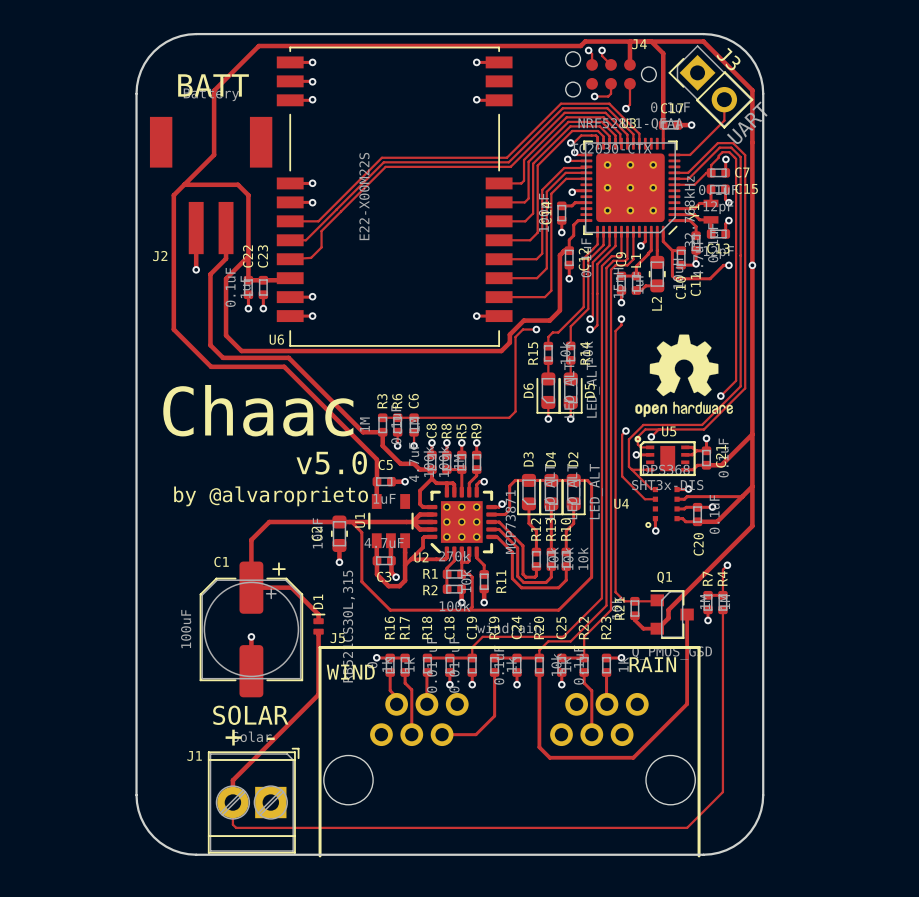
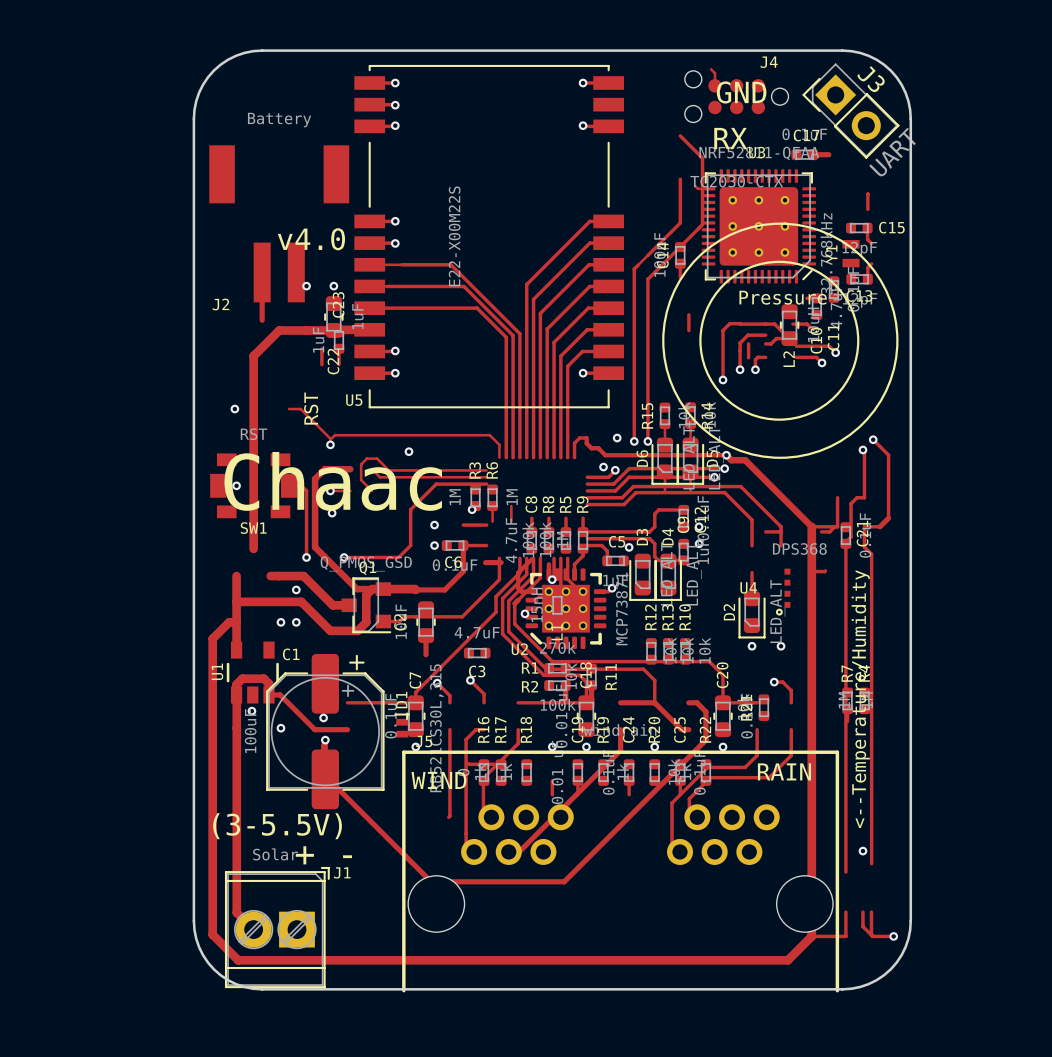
track: (630, 41) (629, 64) -> none
track: (651, 41) (663, 53) (663, 143) -> none
via: (588, 50) -> none
track: (602, 50) (602, 55) (611, 64) -> none
via: (602, 50) -> none
text: none -> GND (741, 92)
track: (611, 83) (611, 93) (608, 96) (594, 96) -> none
track: (629, 83) (629, 104) (625, 108) -> none
text: BATT (213, 85) -> none
via: (594, 96) -> none
track: (724, 99) (724, 120) (690, 154) (674, 154) -> none
track: none -> (680, 135) (702, 158) (702, 224) (647, 279) (647, 441)
via: (625, 108) -> none
text: none -> RX (730, 138)
via: (691, 125) -> none
track: (570, 142) (573, 142) (581, 135) (596, 135) (597, 143) -> none
via: (570, 142) -> none
track: (603, 143) (603, 136) (597, 130) (572, 130) (537, 165) (537, 232) (530, 240) (499, 240) -> (547, 457) (547, 329) (589, 286) (608, 286)
track: (609, 143) (609, 136) (599, 126) (570, 126) (533, 163) (533, 213) -> (680, 179) (680, 222) (647, 255)
track: (615, 143) (615, 135) (601, 121) (568, 121) (528, 161) (528, 198) (524, 202) (499, 202) -> (533, 457) (533, 299) (589, 243) (608, 243)
track: (621, 143) (620, 134) (603, 117) (566, 117) (524, 159) (524, 180) (521, 183) (499, 183) -> (526, 457) (526, 284) (589, 221) (608, 221)
track: (627, 143) (627, 134) (605, 112) (564, 112) (510, 166) (385, 166) (321, 231) (321, 247) (311, 257) (290, 259) -> (506, 457) (506, 337) (477, 308) (369, 308)
track: (633, 143) (633, 134) (607, 108) (562, 108) (508, 162) (383, 162) (305, 240) -> (513, 457) (513, 335) (463, 286) (387, 286)
track: (639, 143) (639, 133) (609, 103) (560, 103) (506, 157) (381, 157) (318, 221) -> (519, 457) (519, 333) (450, 264) (401, 264)
via: (574, 152) -> none
track: (567, 159) (586, 160) -> none
via: (567, 159) -> none
via: (725, 159) -> none
track: (586, 166) (564, 168) (542, 189) (542, 253) (536, 259) (499, 259) -> (554, 457) (554, 342) (588, 308) (608, 308)
C7 footprint: [706, 168, 731, 178] -> [406, 695, 426, 738]
track: (586, 172) (565, 172) (546, 191) (546, 268) (537, 278) (499, 278) -> (560, 457) (560, 356) (587, 329) (608, 329)
track: (674, 172) (688, 172) (717, 143) (733, 143) (745, 155) (745, 388) (704, 429) (645, 429) (637, 436) (637, 444) (640, 447) (650, 447) -> none
C7 name position: C7 (742, 172) -> C7 (415, 680)
track: (586, 178) (566, 178) (551, 193) (551, 290) (544, 297) (499, 297) -> (567, 457) (567, 366) (582, 351) (608, 351)
track: (674, 178) (688, 178) (719, 147) (731, 147) (740, 157) (740, 386) (702, 424) (643, 424) (628, 439) (628, 466) (651, 489) (655, 489) -> none
track: (184, 184) (237, 184) (248, 195) (248, 280) (288, 280) (290, 278) -> (253, 548) (253, 356) (279, 330) (369, 329)
drawing: none -> [662, 222, 899, 459]
track: (674, 184) (694, 184) (706, 172) (711, 172) (711, 165) (722, 152) (729, 152) (736, 158) (736, 380) (720, 396) -> none
track: (711, 189) (711, 203) (699, 203) (694, 208) (674, 208) -> none
track: (586, 190) (572, 192) -> none
via: (572, 192) -> none
text: none -> v4.0 (311, 239)
track: (586, 202) (561, 205) -> none
via: (728, 202) -> none
track: (674, 214) (694, 214) (699, 219) (711, 219) (711, 234) -> none
track: (586, 220) (578, 220) (573, 225) (573, 235) (569, 239) (569, 250) (563, 251) -> none
track: (674, 220) (690, 220) (696, 226) (696, 235) -> none
via: (728, 220) -> none
track: (499, 221) (525, 221) -> (634, 441) (634, 269) (638, 264)
track: none -> (608, 264) (589, 264) (540, 313) (540, 457)
track: (226, 228) (226, 258) (210, 274) (210, 345) (223, 357) (288, 357) (363, 432) (382, 432) (382, 445) (400, 463) (414, 463) (419, 469) (431, 469) (431, 478) (436, 483) (452, 483) (454, 492) -> none
track: (597, 231) (597, 244) (593, 248) -> none
track: (603, 231) (603, 245) (588, 260) (588, 308) (570, 326) (570, 345) -> none
track: (609, 231) (609, 245) (592, 262) (592, 316) (590, 319) -> none
track: (615, 231) (615, 246) (597, 264) (597, 325) (593, 329) (590, 329) -> none
track: (621, 231) (621, 254) (611, 256) (601, 266) (601, 598) (563, 636) (482, 636) (472, 647) (472, 658) (427, 658) -> none
track: (627, 231) (627, 258) (625, 260) (613, 260) (606, 267) (606, 605) (570, 641) (548, 641) (539, 650) (539, 658) (494, 658) -> none
track: (633, 231) (633, 259) (627, 265) (615, 265) (611, 269) (611, 610) (584, 636) (584, 658) (561, 658) -> none
track: (645, 231) (645, 241) (640, 245) -> none
track: (651, 231) (651, 250) (636, 266) (636, 276) (621, 276) -> none
track: (657, 231) (657, 262) -> none
track: (663, 231) (663, 241) (672, 250) (672, 276) (675, 278) (710, 278) (723, 265) (728, 265) -> none
via: (561, 232) -> none
via: none -> (306, 286)
via: none -> (333, 286)
via: (640, 245) -> none
track: (593, 249) (583, 258) (583, 307) (558, 332) (552, 332) (548, 336) (548, 346) -> none
text: none -> Pressure (783, 297)
track: (696, 250) (696, 263) (681, 265) -> none
track: (563, 251) (559, 255) (559, 310) (549, 320) (523, 320) (509, 334) (509, 342) (501, 351) (241, 351) (226, 335) (226, 278) (248, 256) -> none
C22 name position: C22 (248, 256) -> C22 (333, 361)
C12 position: (569, 257) -> (683, 518)
L1 name position: L1 (636, 260) -> L1 (557, 632)
via: (696, 263) -> none
via: (728, 265) -> none
via: (752, 265) -> none
via: (196, 269) -> none
track: none -> (792, 324) (807, 324) (811, 328)
C22 footprint: [243, 275, 254, 300] -> [324, 296, 344, 338]
via: (569, 278) -> none
track: none -> (765, 335) (747, 335) (740, 343) (740, 369)
track: none -> (784, 335) (774, 324) (729, 323) (723, 330) (723, 380)
C9 position: (621, 283) -> (683, 552)
L1 position: (636, 283) -> (557, 605)
C22 value: 0.1uF (230, 287) -> 1uF (357, 316)
track: none -> (796, 346) (829, 346) (835, 352)
via: none -> (835, 352)
via: (621, 302) -> none
track: none -> (765, 357) (757, 357) (755, 359) (755, 369)
track: none -> (796, 357) (816, 357) (822, 362)
via: none -> (822, 362)
via: (248, 308) -> none
via: (263, 308) -> none
via: none -> (740, 369)
via: none -> (755, 369)
via: (590, 319) -> none
track: (621, 319) (621, 325) (615, 331) (615, 592) (624, 601) (657, 600) -> none
via: (621, 319) -> none
via: none -> (723, 380)
track: (536, 329) (522, 329) (515, 336) (515, 411) (509, 417) (382, 417) -> none
via: (536, 329) -> none
via: (590, 329) -> none
drawing: [635, 334, 733, 418] -> none
U6 name: U6 (276, 339) -> U5 (354, 400)
via: none -> (234, 409)
track: none -> (289, 409) (300, 409) (330, 438) (330, 444)
text: none -> RST (311, 408)
via: none -> (617, 438)
track: none -> (330, 439) (334, 435) (489, 435) (499, 444) (499, 457)
via: none -> (873, 439)
via: none -> (634, 441)
via: none -> (647, 441)
via: none -> (330, 444)
track: none -> (862, 449) (864, 497) (857, 497) (851, 503) (851, 537) (845, 542) (845, 871)
via: none -> (862, 449)
via: none -> (408, 451)
via: none -> (726, 455)
track: none -> (574, 457) (574, 443) (579, 438) (586, 438) (586, 443) (591, 448) (598, 448) (605, 455) (726, 455) (731, 460) (745, 460) (811, 526)
via: (720, 396) -> none
via: none -> (603, 467)
track: none -> (724, 468) (629, 468) (613, 484) (587, 484)
via: none -> (724, 468)
track: none -> (350, 469) (324, 469) (315, 478) (315, 547) (356, 589) (383, 589)
track: none -> (372, 469) (380, 477) (486, 477)
track: none -> (615, 470) (608, 477) (587, 477)
via: none -> (615, 470)
track: none -> (486, 470) (388, 470) (377, 458) (366, 458) (361, 464) (361, 480) (372, 490)
track: none -> (714, 477) (629, 477) (615, 490) (587, 490)
via: none -> (714, 477)
track: none -> (486, 484) (436, 484) (410, 509) (410, 545) (398, 557) (344, 557)
via: none -> (236, 485)
SW1: none -> RST (253, 485)
track: none -> (289, 485) (301, 485) (306, 490) (306, 557)
track: none -> (330, 490) (350, 490)
via: none -> (330, 490)
via: (548, 419) -> none
via: (570, 419) -> none
C6 rotation: 0° (414, 425) -> 90° clockwise (455, 545)
C6 position: (414, 425) -> (455, 545)
track: none -> (587, 497) (622, 497) (633, 486) (740, 486) (781, 526) (781, 545)
track: none -> (837, 497) (837, 526) (811, 526)
track: (658, 429) (651, 436) -> none
track: none -> (587, 504) (624, 504) (635, 492) (724, 492) (752, 519) (752, 545)
track: (625, 430) (622, 434) (622, 476) (644, 499) (655, 499) -> none
via: (625, 430) -> none
track: (752, 434) (743, 442) -> (873, 439) (888, 455) (888, 518)
via: none -> (472, 509)
track: none -> (683, 509) (658, 509) (654, 513) (654, 526) (649, 531) (587, 531)
via: (651, 436) -> none
via: none -> (332, 513)
track: (706, 438) (706, 450) (695, 450) (692, 447) (685, 447) -> none
via: (706, 438) -> none
via: (431, 442) -> none
via: (446, 442) -> none
via: (461, 442) -> none
via: (476, 442) -> none
via: (397, 445) -> none
via: (414, 445) -> none
via: none -> (434, 525)
track: none -> (463, 525) (486, 525)
via: none -> (699, 526)
track: none -> (811, 526) (811, 936)
track: (736, 450) (721, 465) (697, 465) (693, 469) (685, 469) -> (880, 526) (864, 526) (864, 547) (871, 554) (871, 863)
via: (636, 454) -> none
U5: SHT3x-DIS (665, 455) -> none
D2 name position: D2 (573, 459) -> D2 (729, 612)
track: none -> (587, 538) (649, 538) (654, 543) (654, 556) (658, 560) (683, 560)
text: v5.0 (331, 462) -> none
via: none -> (699, 543)
via: none -> (434, 545)
track: none -> (486, 545) (463, 545) (463, 571) (444, 589) (372, 589) (366, 595) (366, 622) (357, 630) (330, 630) (301, 601) (236, 601)
track: none -> (587, 545) (601, 545) (607, 550) (607, 560)
via: none -> (629, 547)
track: (446, 469) (461, 469) (461, 492) -> none
track: (631, 469) (650, 469) -> none
via: none -> (306, 557)
via: none -> (344, 557)
track: none -> (499, 558) (499, 579) (462, 616) (404, 616) (399, 621) (383, 621)
track: none -> (519, 558) (519, 572) (496, 596) (496, 612) (415, 692) (415, 702) (347, 702)
track: none -> (526, 558) (526, 574) (502, 598) (502, 634) (543, 675) (579, 675) (586, 682) (586, 702) (518, 702)
track: none -> (533, 558) (533, 576) (508, 601) (508, 631) (546, 669) (643, 669) (654, 680) (654, 702)
track: none -> (554, 558) (554, 577) (552, 579)
track: none -> (560, 558) (560, 593) (557, 597) (538, 597)
track: none -> (567, 558) (567, 579) (579, 591) (579, 598)
C5 position: (384, 481) -> (615, 560)
via: (405, 481) -> none
track: (484, 481) (479, 481) (476, 484) (476, 492) -> none
via: (484, 481) -> none
track: (752, 486) (717, 521) (685, 521) (682, 518) (677, 518) -> none
via: (688, 489) -> none
track: none -> (752, 572) (752, 598)
track: none -> (236, 576) (236, 650)
track: none -> (270, 576) (303, 576) (332, 605) (349, 605)
D2 position: (573, 494) -> (752, 614)
text: by @alvaroprieto (271, 496) -> none
via: none -> (552, 579)
track: (742, 496) (687, 496) (684, 499) (677, 499) -> none
track: (376, 501) (376, 459) (284, 366) (211, 366) (173, 329) (173, 195) (214, 154) (214, 90) (258, 46) (580, 46) (585, 41) (703, 41) (752, 90) (752, 526) (668, 609) (668, 618) (658, 628) (643, 628) (634, 620) (634, 615) -> none
C20 footprint: [692, 502, 703, 527] -> [713, 695, 733, 738]
track: (528, 503) (528, 523) (536, 530) (536, 552) -> none
track: (551, 503) (551, 552) -> none
track: (573, 503) (573, 523) (566, 530) (566, 552) -> none
via: none -> (296, 589)
track: (712, 507) (677, 508) -> none
via: (712, 507) -> none
track: (420, 514) (432, 514) -> (518, 600) (540, 577) (540, 558)
track: (491, 514) (505, 514) (509, 509) (509, 486) (515, 480) (587, 480) (591, 484) (591, 577) (558, 610) (390, 610) (361, 581) (361, 532) (349, 522) -> none
track: (417, 517) (414, 523) (420, 529) (432, 529) -> (514, 603) (514, 624) (552, 661) (709, 661) (723, 675) (723, 702) (757, 702)
track: (655, 518) (655, 530) -> none
U1 position: (390, 521) -> (252, 672)
track: (432, 522) (269, 522) (251, 539) (251, 587) (291, 587) (318, 614) (318, 621) -> none
track: (491, 522) (499, 522) (522, 545) (522, 574) (525, 577) (536, 575) (536, 566) -> none
via: none -> (525, 613)
track: (491, 529) (499, 529) (517, 548) (517, 576) (523, 582) (546, 582) (551, 577) (551, 566) -> none
via: (655, 530) -> none
track: none -> (236, 622) (229, 622) (212, 638) (212, 934) (238, 960) (787, 960) (811, 936)
via: none -> (280, 622)
via: none -> (296, 622)
track: (432, 536) (423, 538) (423, 547) (405, 565) -> none
track: (491, 536) (497, 536) (512, 552) (512, 578) (521, 587) (558, 587) (566, 580) (566, 566) -> none
track: (376, 540) (376, 574) (388, 586) (399, 586) (405, 580) (405, 540) -> none
track: (390, 540) (391, 572) (396, 577) -> none
C20 name position: C20 (698, 544) -> C20 (722, 675)
track: (446, 551) (445, 559) (411, 559) -> none
track: (454, 551) (454, 560) (446, 568) (447, 589) -> none
track: (461, 551) (461, 574) -> none
track: (469, 551) (469, 560) (461, 562) -> none
track: (476, 551) (476, 557) (484, 565) (484, 574) -> none
via: none -> (752, 646)
via: none -> (781, 646)
via: (339, 562) -> none
track: (727, 565) (722, 569) (722, 595) (708, 595) -> none
via: (727, 565) -> none
track: (461, 574) (469, 574) (472, 577) (472, 607) (469, 610) -> none
via position: (396, 577) -> (470, 680)
track: none -> (470, 680) (484, 694) (484, 702)
track: none -> (774, 682) (782, 682) (791, 690) (791, 702)
via: none -> (774, 682)
track: none -> (437, 683) (449, 695) (449, 702)
via: none -> (437, 683)
track: none -> (236, 694) (236, 684) (242, 678) (263, 678) (269, 683) (269, 694) (280, 694) (314, 729) (347, 729)
track: none -> (236, 695) (236, 912) (253, 929)
text: none -> <--Temperature/Humidity (860, 699)
via: (461, 602) -> none
via: (484, 602) -> none
track: none -> (620, 702) (654, 702)
track: none -> (654, 702) (681, 729) (688, 729)
track: none -> (688, 702) (696, 702) (705, 711) (705, 740) (564, 881) (431, 881) (323, 774) (323, 745)
track: (722, 609) (722, 792) (687, 827) (236, 827) (232, 824) (232, 780) (318, 694) (318, 631) -> none
via: none -> (251, 711)
Q1 rotation: 0° (672, 614) -> 180° (366, 605)
Q1 position: (672, 614) -> (366, 605)
track: (687, 614) (687, 704) (633, 757) (549, 757) (539, 747) (539, 672) -> none
via: none -> (323, 717)
via: (708, 620) -> none
via: none -> (280, 728)
track: none -> (449, 729) (448, 817)
track: none -> (484, 729) (475, 729) (466, 739) (466, 851)
track: none -> (518, 729) (518, 743) (483, 778) (483, 817)
track: none -> (620, 729) (620, 750) (519, 851) (500, 851)
track: none -> (791, 729) (791, 755) (769, 777) (710, 777) (689, 798) (689, 817)
via: none -> (415, 746)
via: none -> (552, 746)
via: none -> (586, 746)
via: none -> (654, 746)
C18 footprint: [445, 653, 455, 677] -> [576, 695, 597, 738]
via: (376, 657) -> none
via position: (621, 657) -> (723, 746)
track: (606, 658) (621, 658) -> (757, 729) (757, 755) (748, 764)
track: none -> (748, 764) (745, 767) (707, 767) (672, 803) (672, 851)
R23: 1k (606, 665) -> none
track: (390, 672) (390, 690) (396, 697) (396, 704) -> none
track: (405, 672) (405, 683) (411, 689) (411, 734) -> none
track: (427, 672) (426, 704) -> none
track: (494, 672) (494, 715) (475, 734) (442, 734) -> none
track: (584, 672) (584, 683) (591, 690) (591, 734) -> none
track: (606, 672) (606, 704) -> none
via: (449, 684) -> none
via: (472, 684) -> none
via: (517, 684) -> none
via: (561, 684) -> none
text: none -> (3-5.5V) (277, 826)
text: SOLAR (250, 715) -> none
via: none -> (862, 851)
J1 name position: J1 (194, 756) -> J1 (342, 872)
track: none -> (845, 912) (845, 936) (811, 936)
track: none -> (862, 912) (862, 926) (872, 936) (893, 936)
track: none -> (871, 912) (871, 935)
J1 position: (253, 800) -> (277, 927)
via: none -> (893, 936)

